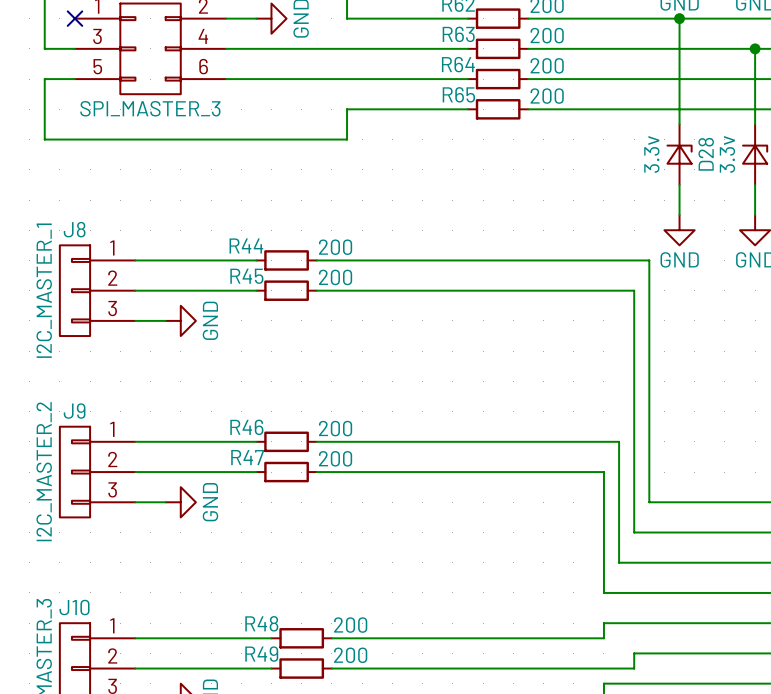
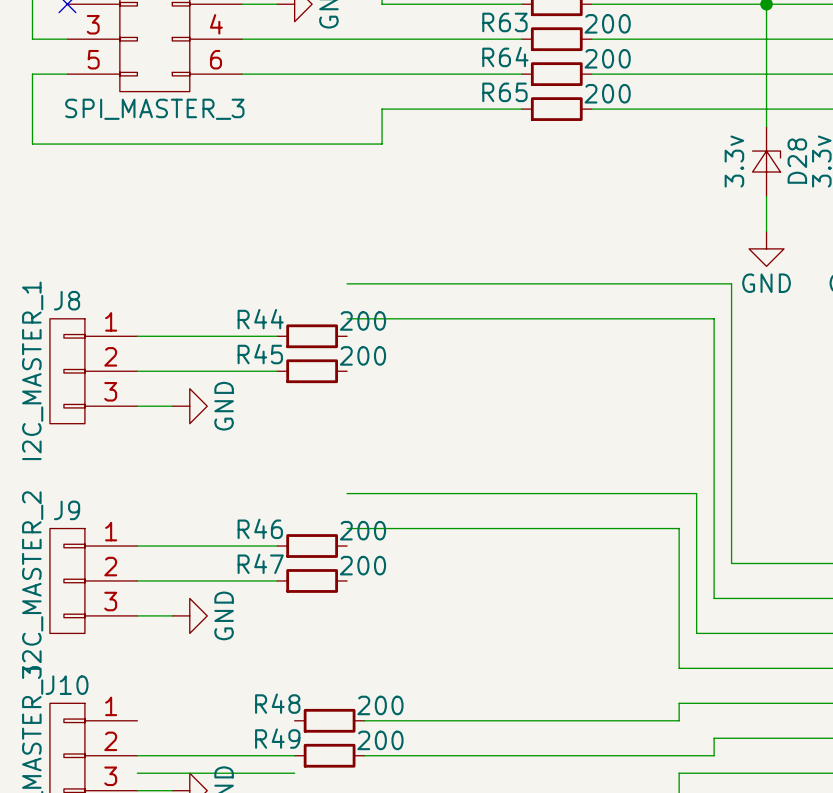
wire: (135, 260) (256, 260) -> (137, 336) (277, 336)
R44 position: (286, 260) -> (312, 336)
J8 position: (97, 290) -> (93, 371)
wire: (135, 290) (256, 290) -> (137, 371) (277, 371)
R45 position: (286, 290) -> (312, 371)
wire: (135, 320) (165, 320) -> (137, 406) (172, 406)
power symbol position: GND (180, 320) -> GND (189, 406)
wire: (135, 441) (256, 441) -> (137, 546) (277, 546)
R46 position: (286, 441) -> (312, 546)
J9 position: (97, 472) -> (93, 580)
wire: (135, 472) (256, 472) -> (137, 580) (277, 580)
R47 position: (286, 472) -> (312, 580)
wire: (135, 502) (165, 502) -> (137, 615) (172, 615)
power symbol position: GND (180, 502) -> GND (189, 615)
wire: (135, 638) (271, 638) -> (137, 773) (294, 773)

